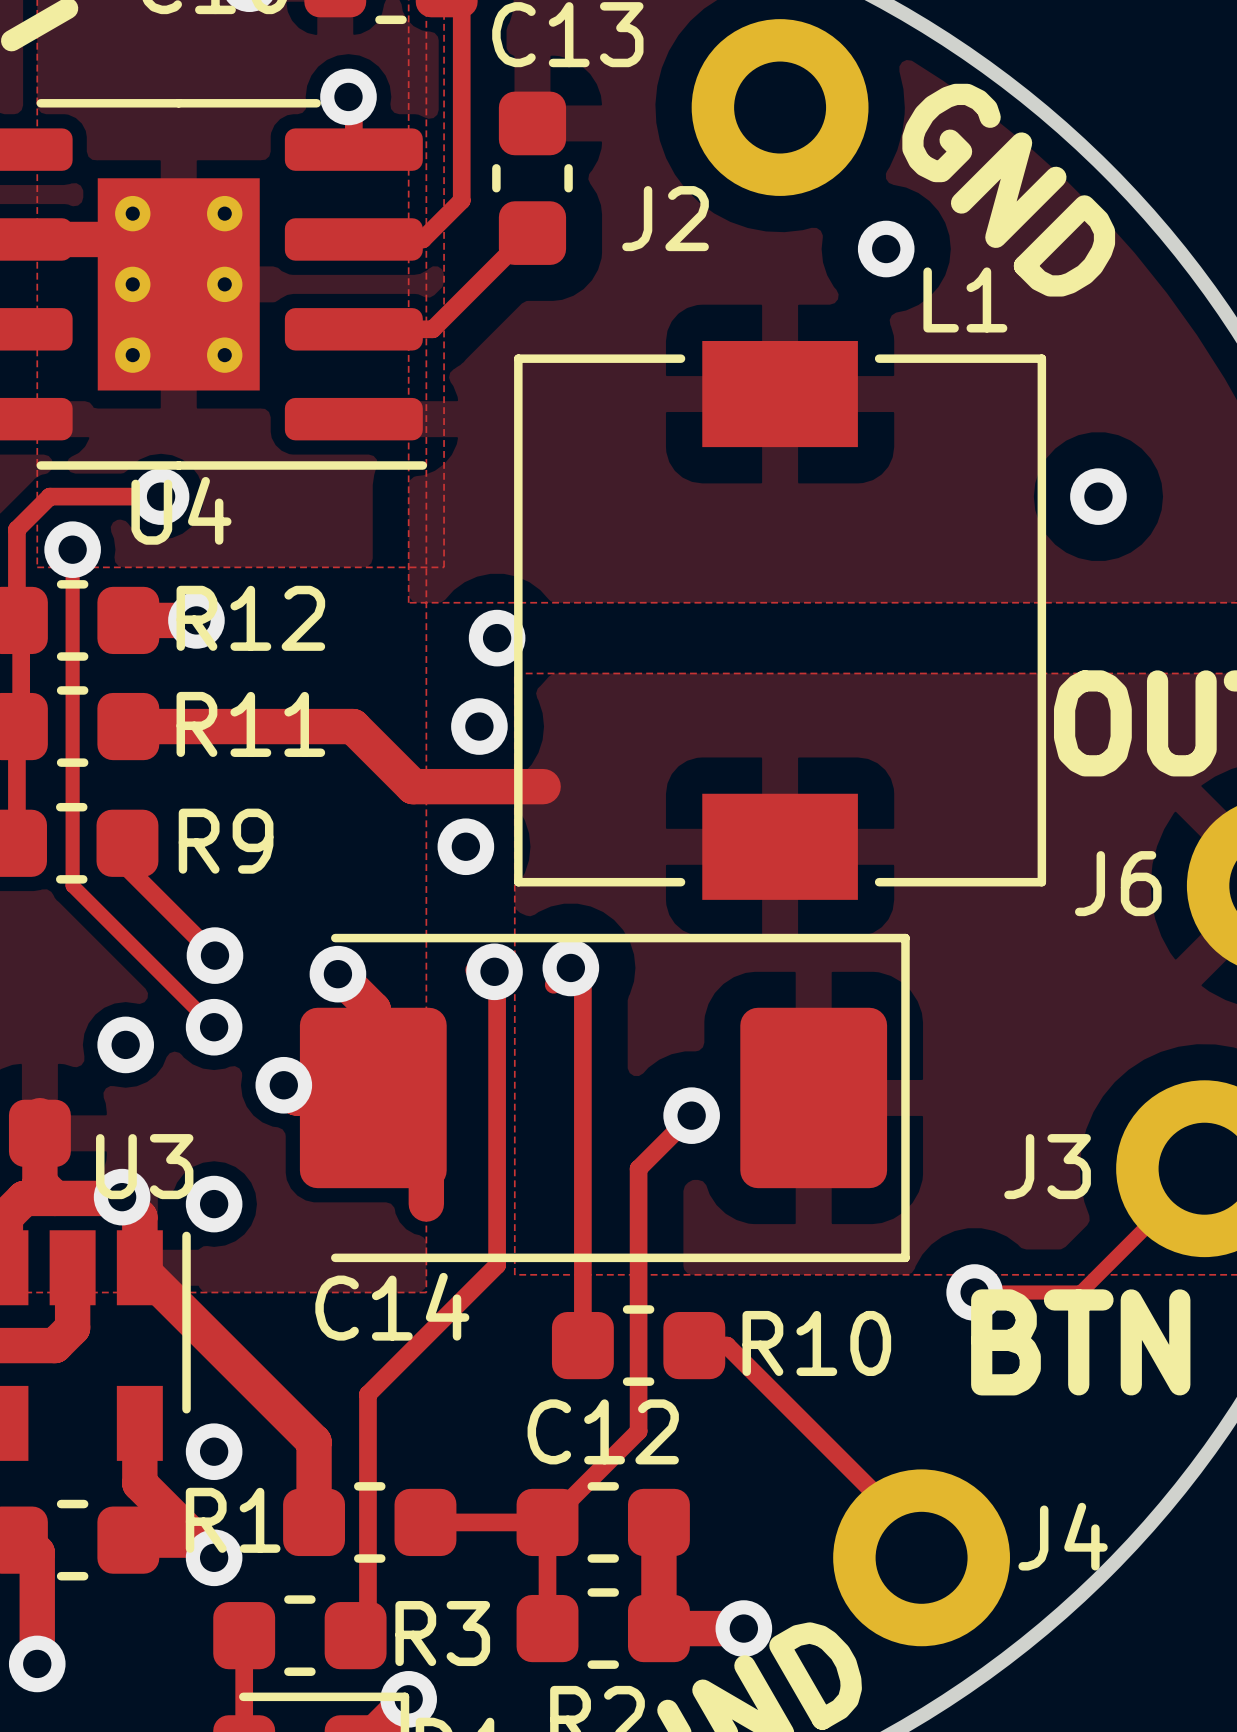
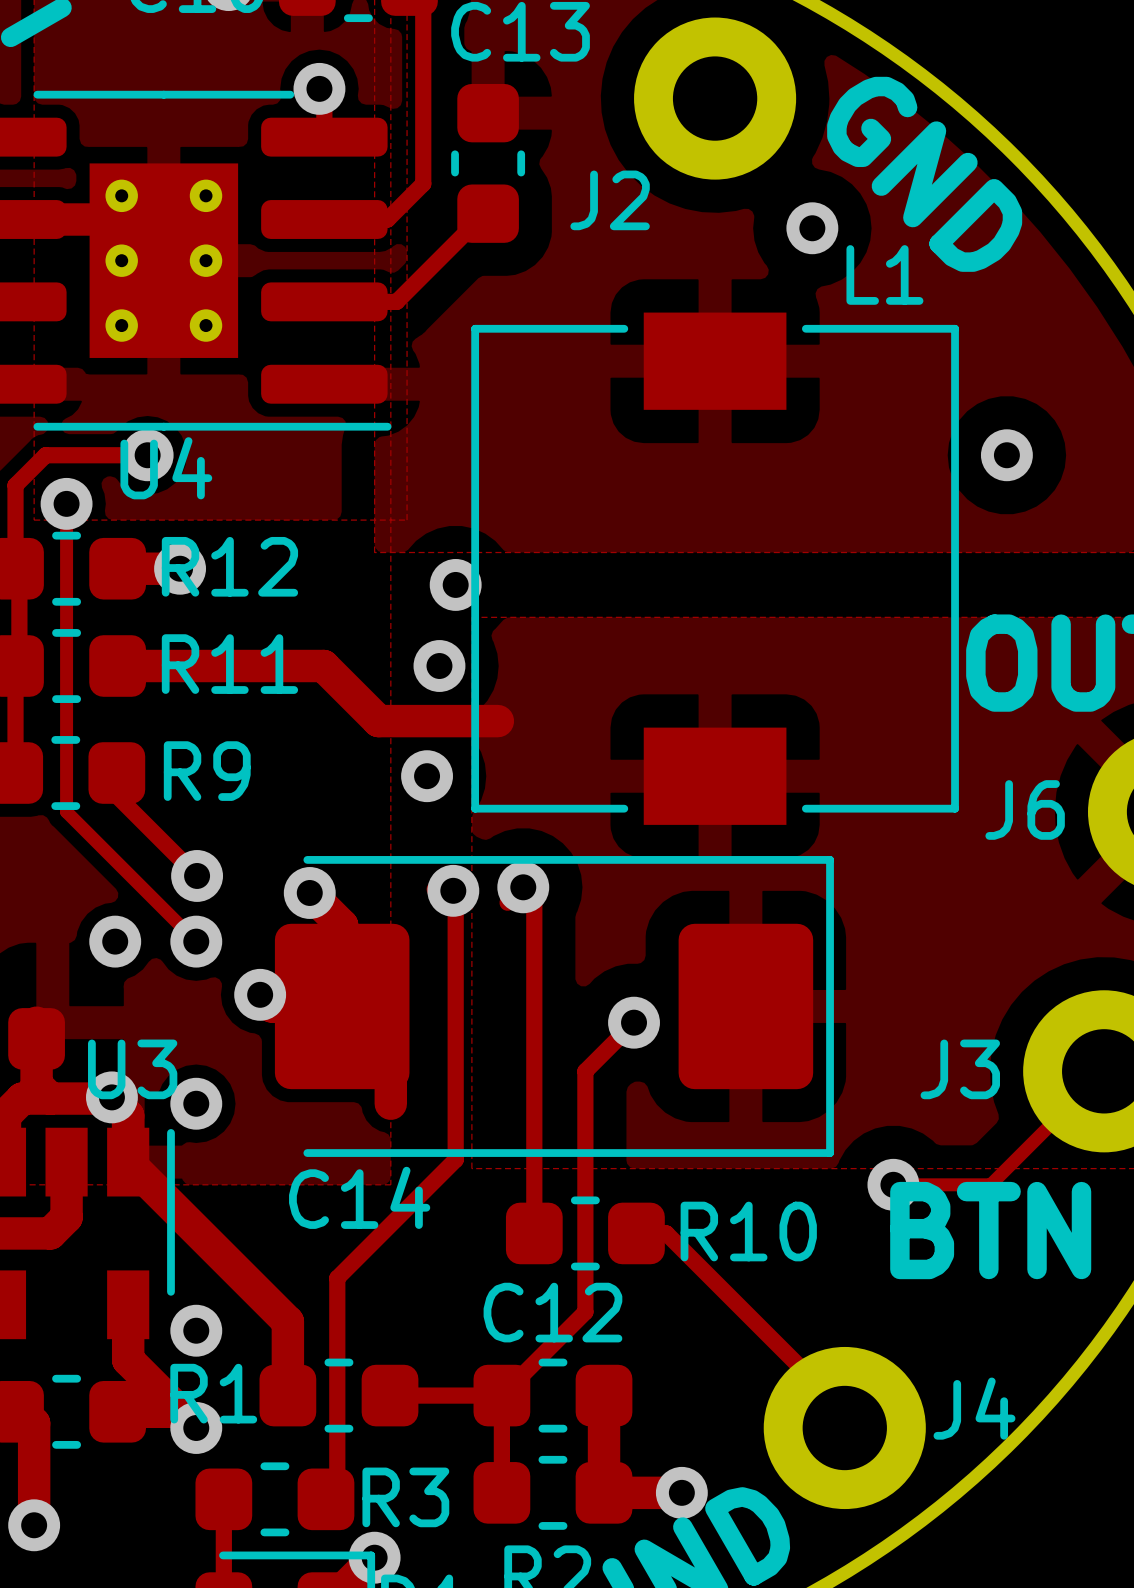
via position: (125, 1044) -> (115, 941)

